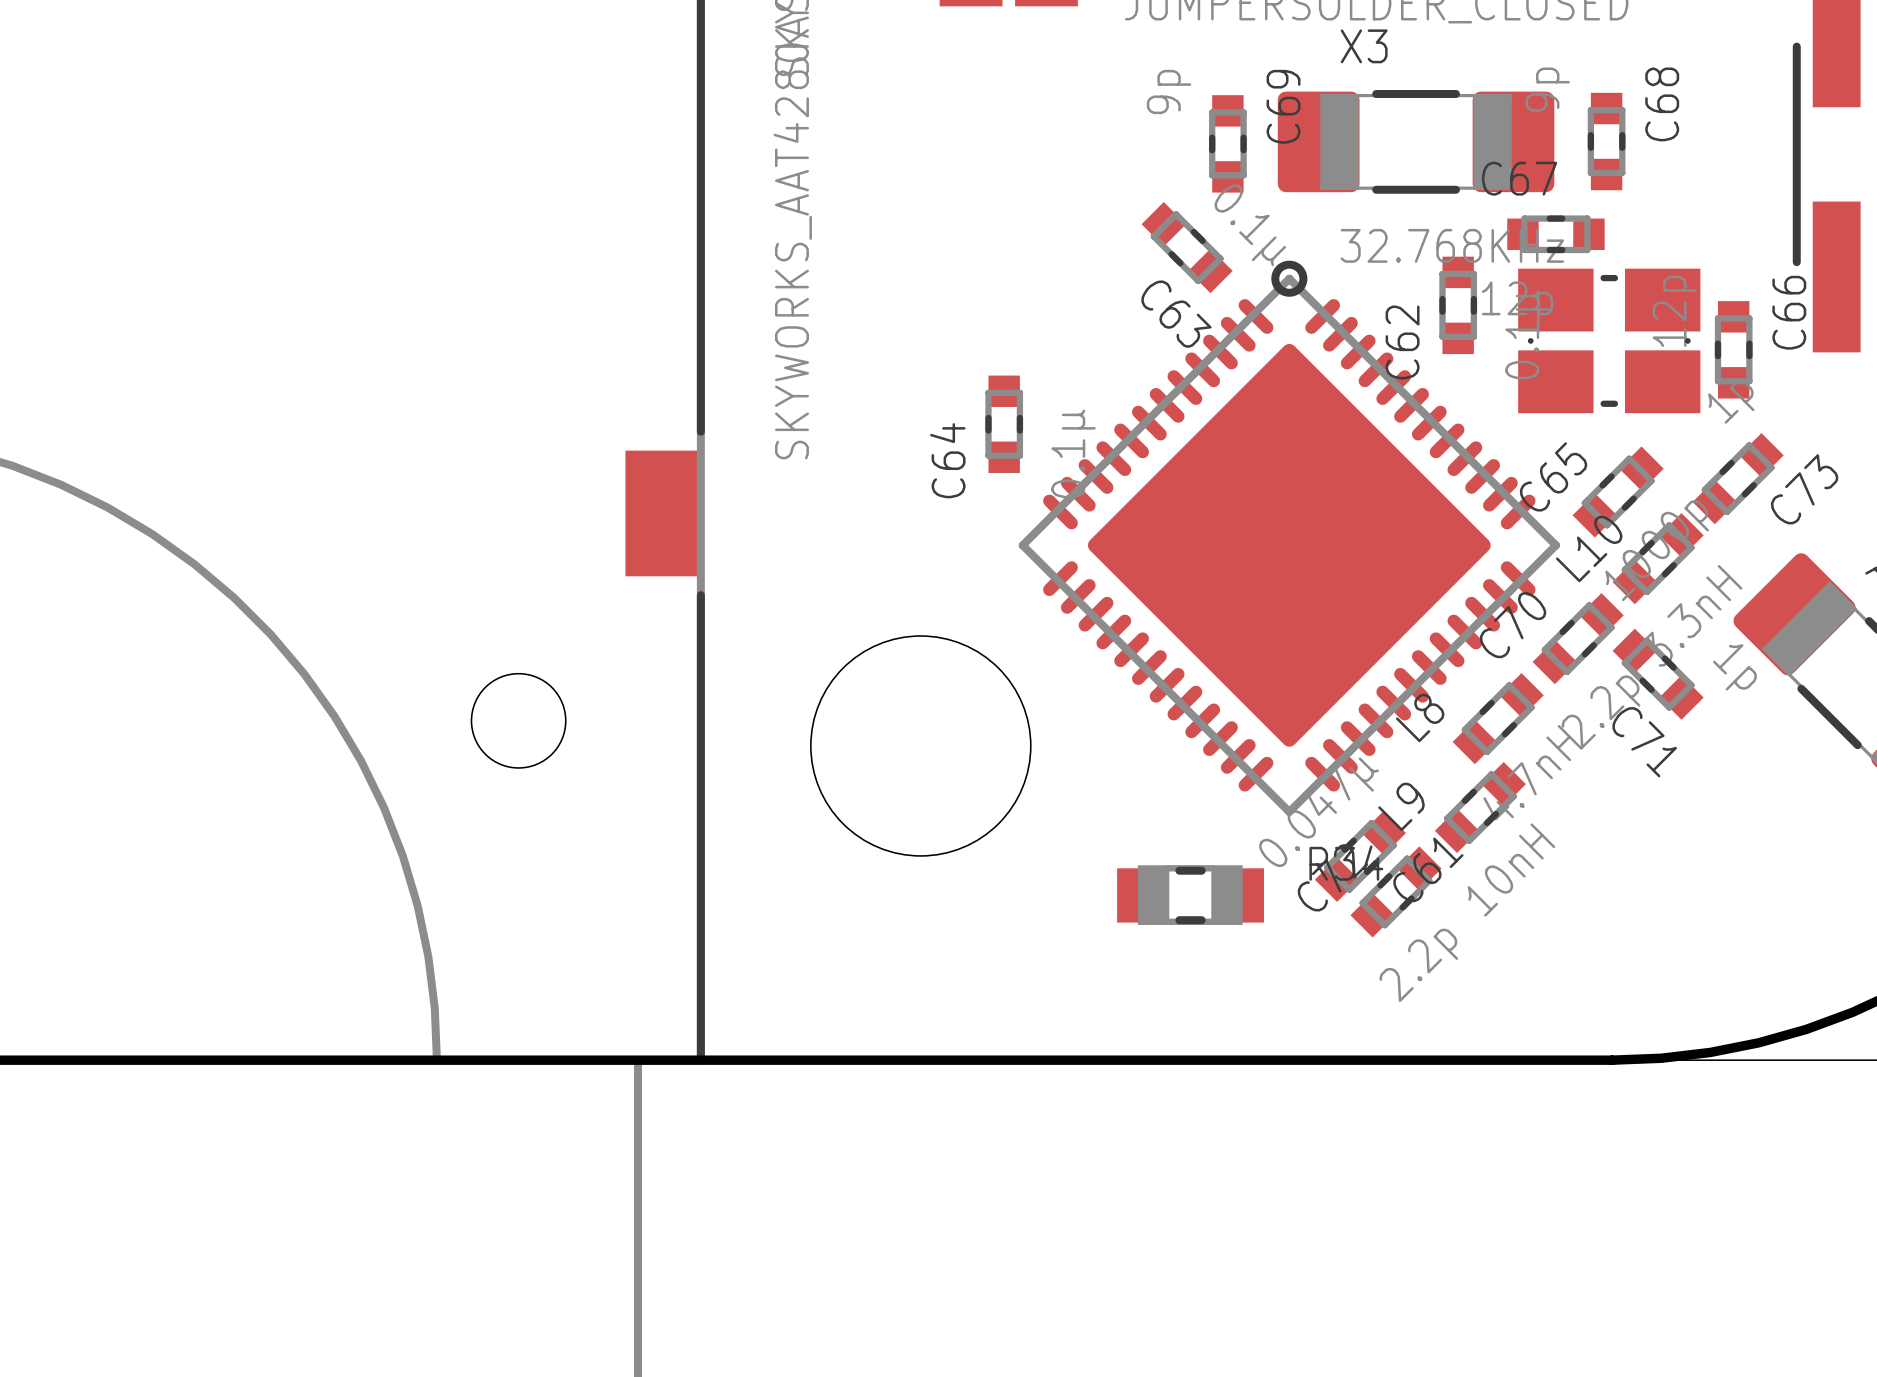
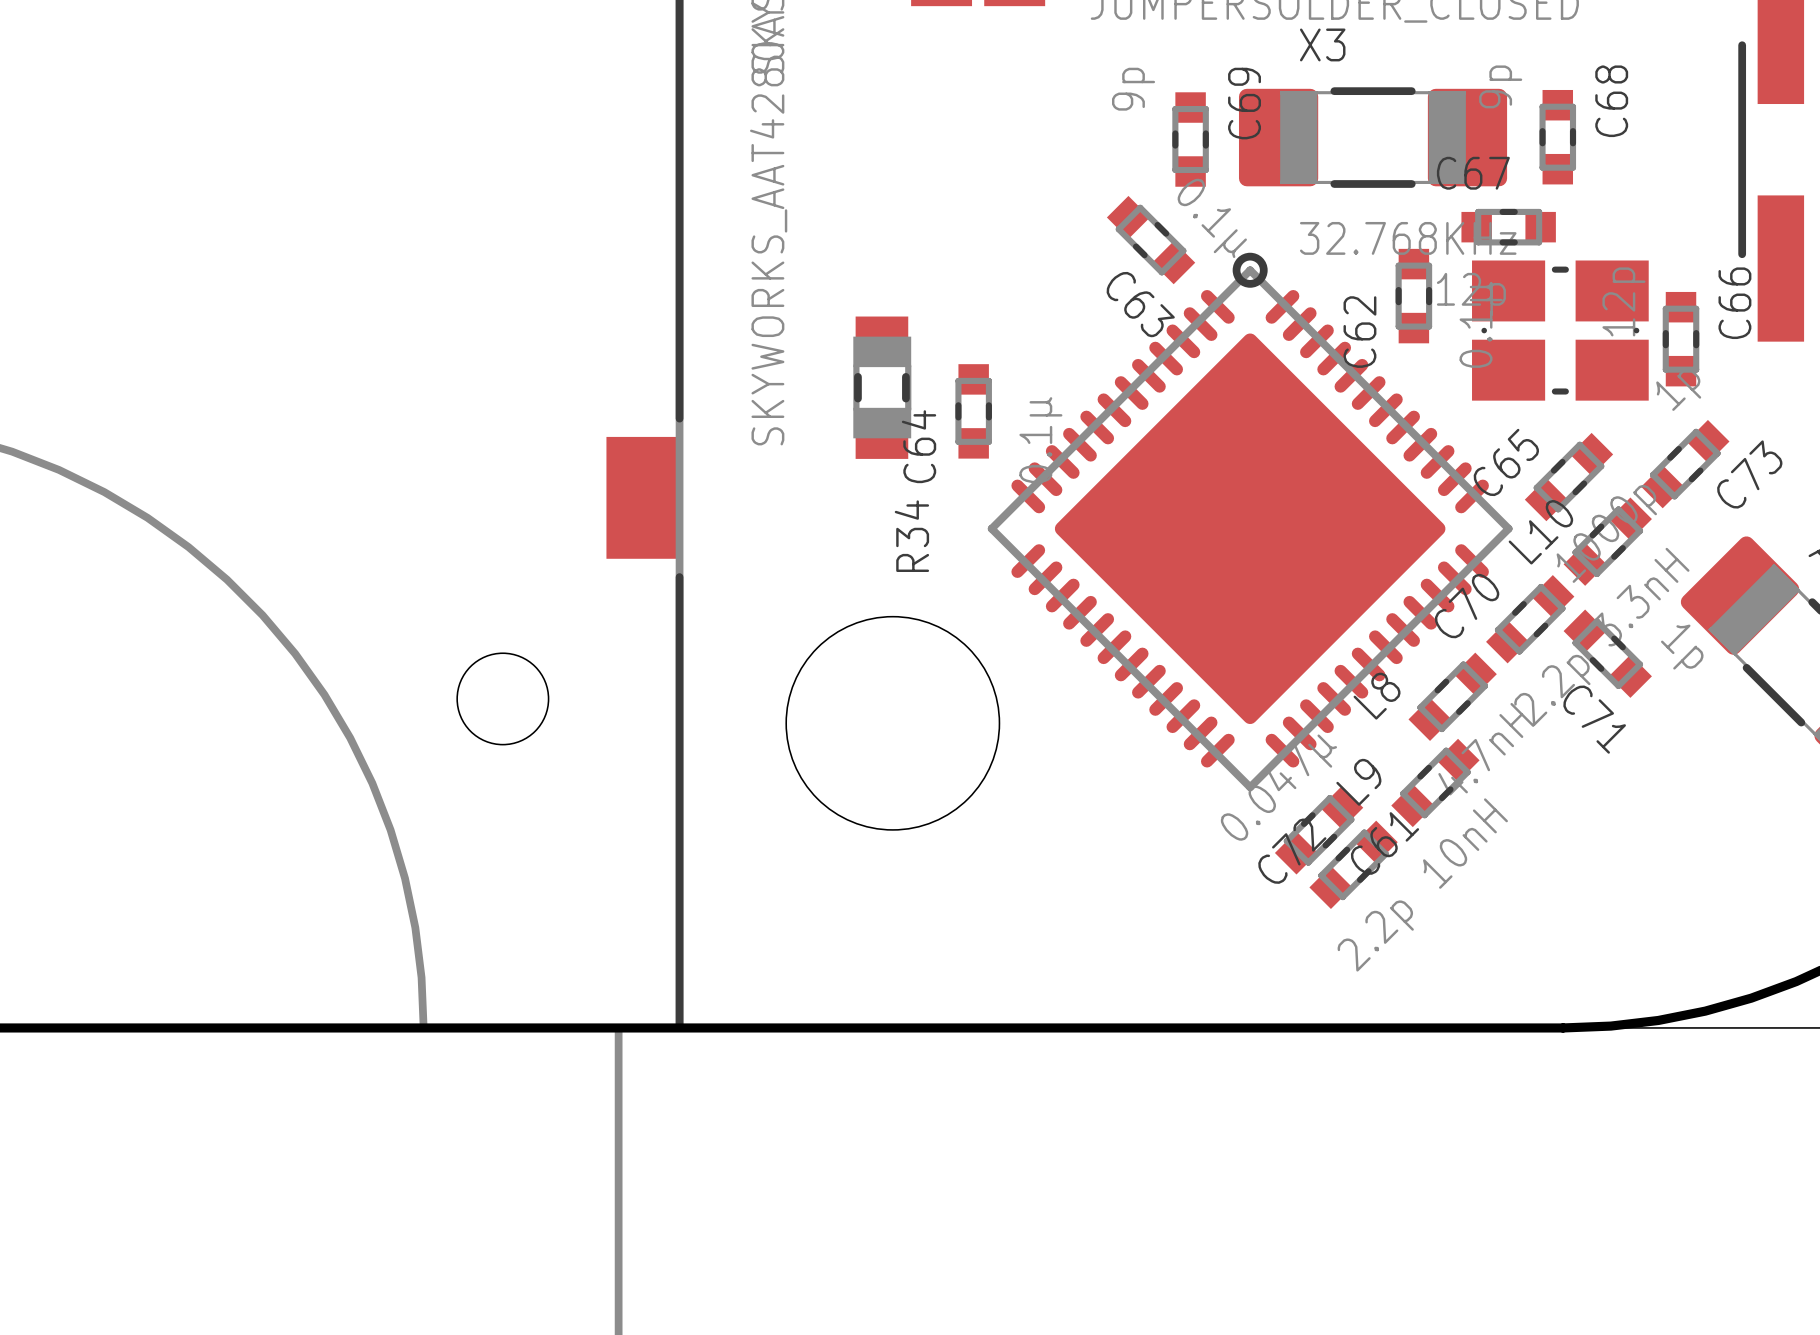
R34 rotation: 0° (1190, 895) -> 90° clockwise (882, 387)
R34 position: (1190, 895) -> (882, 387)

